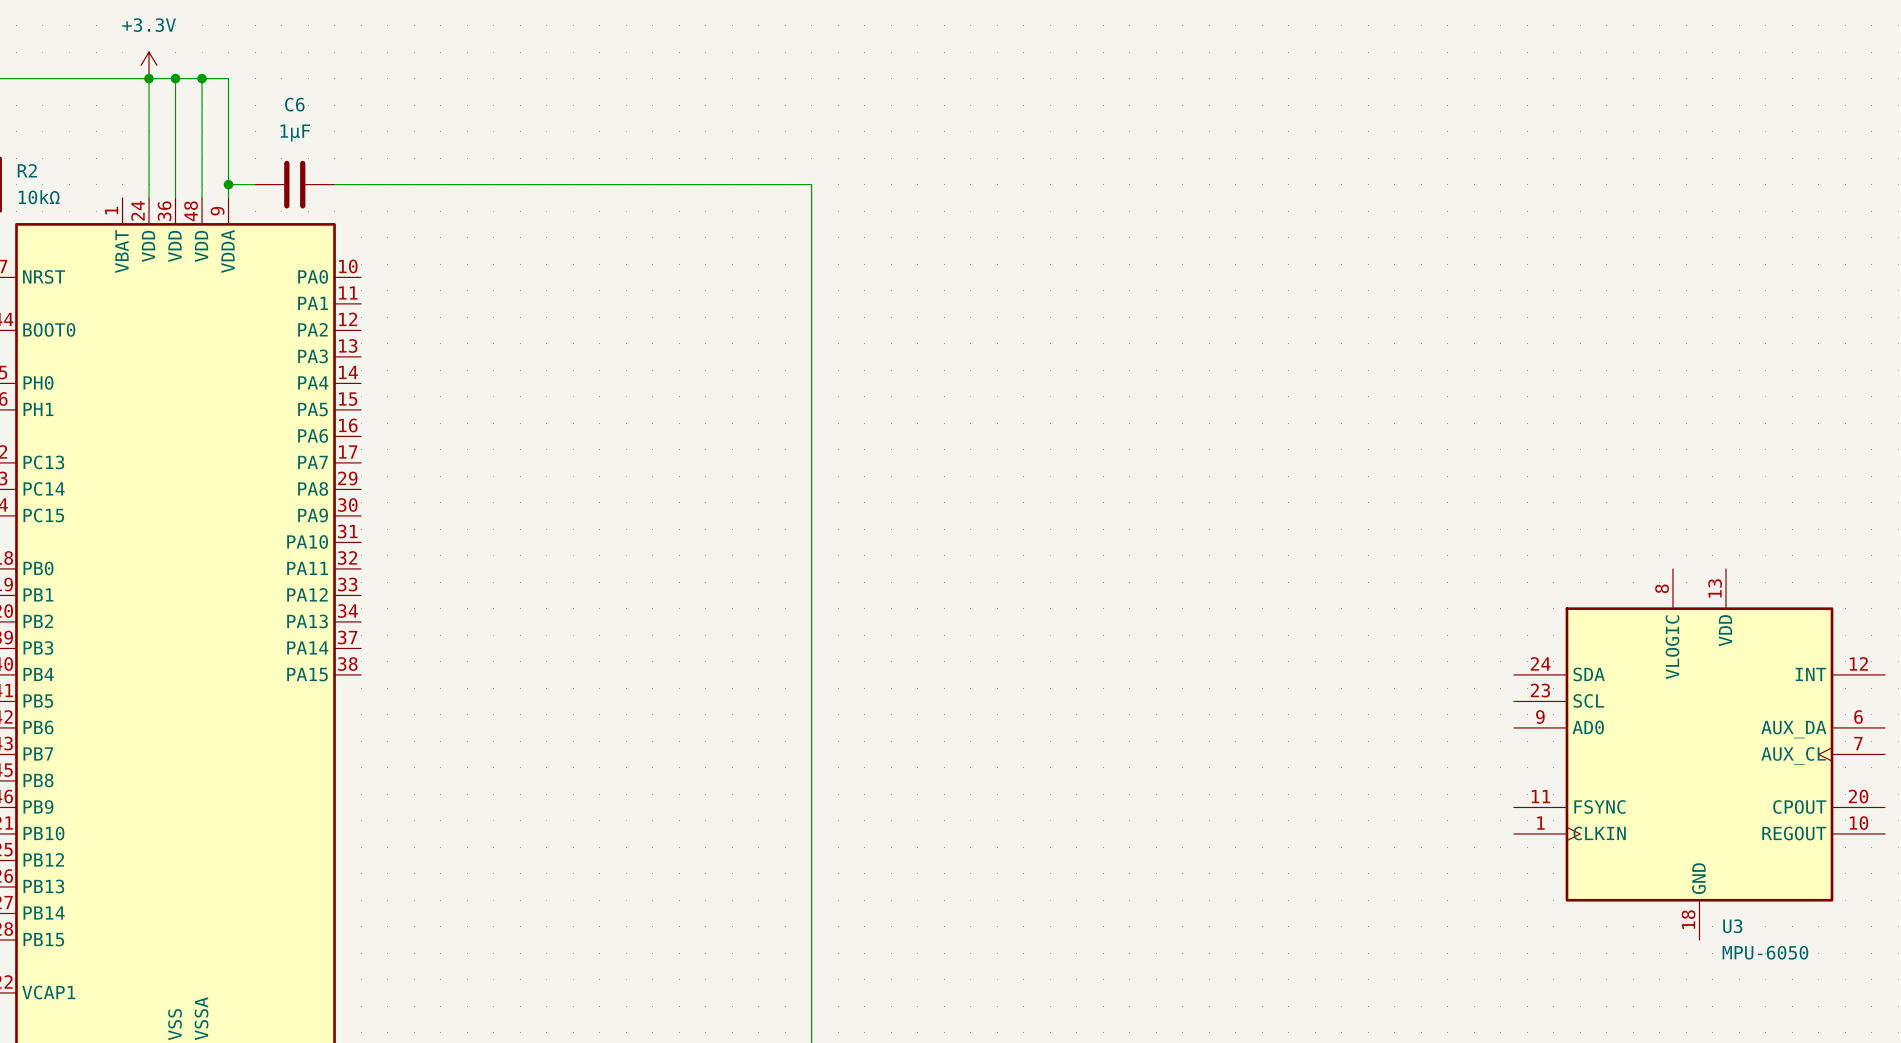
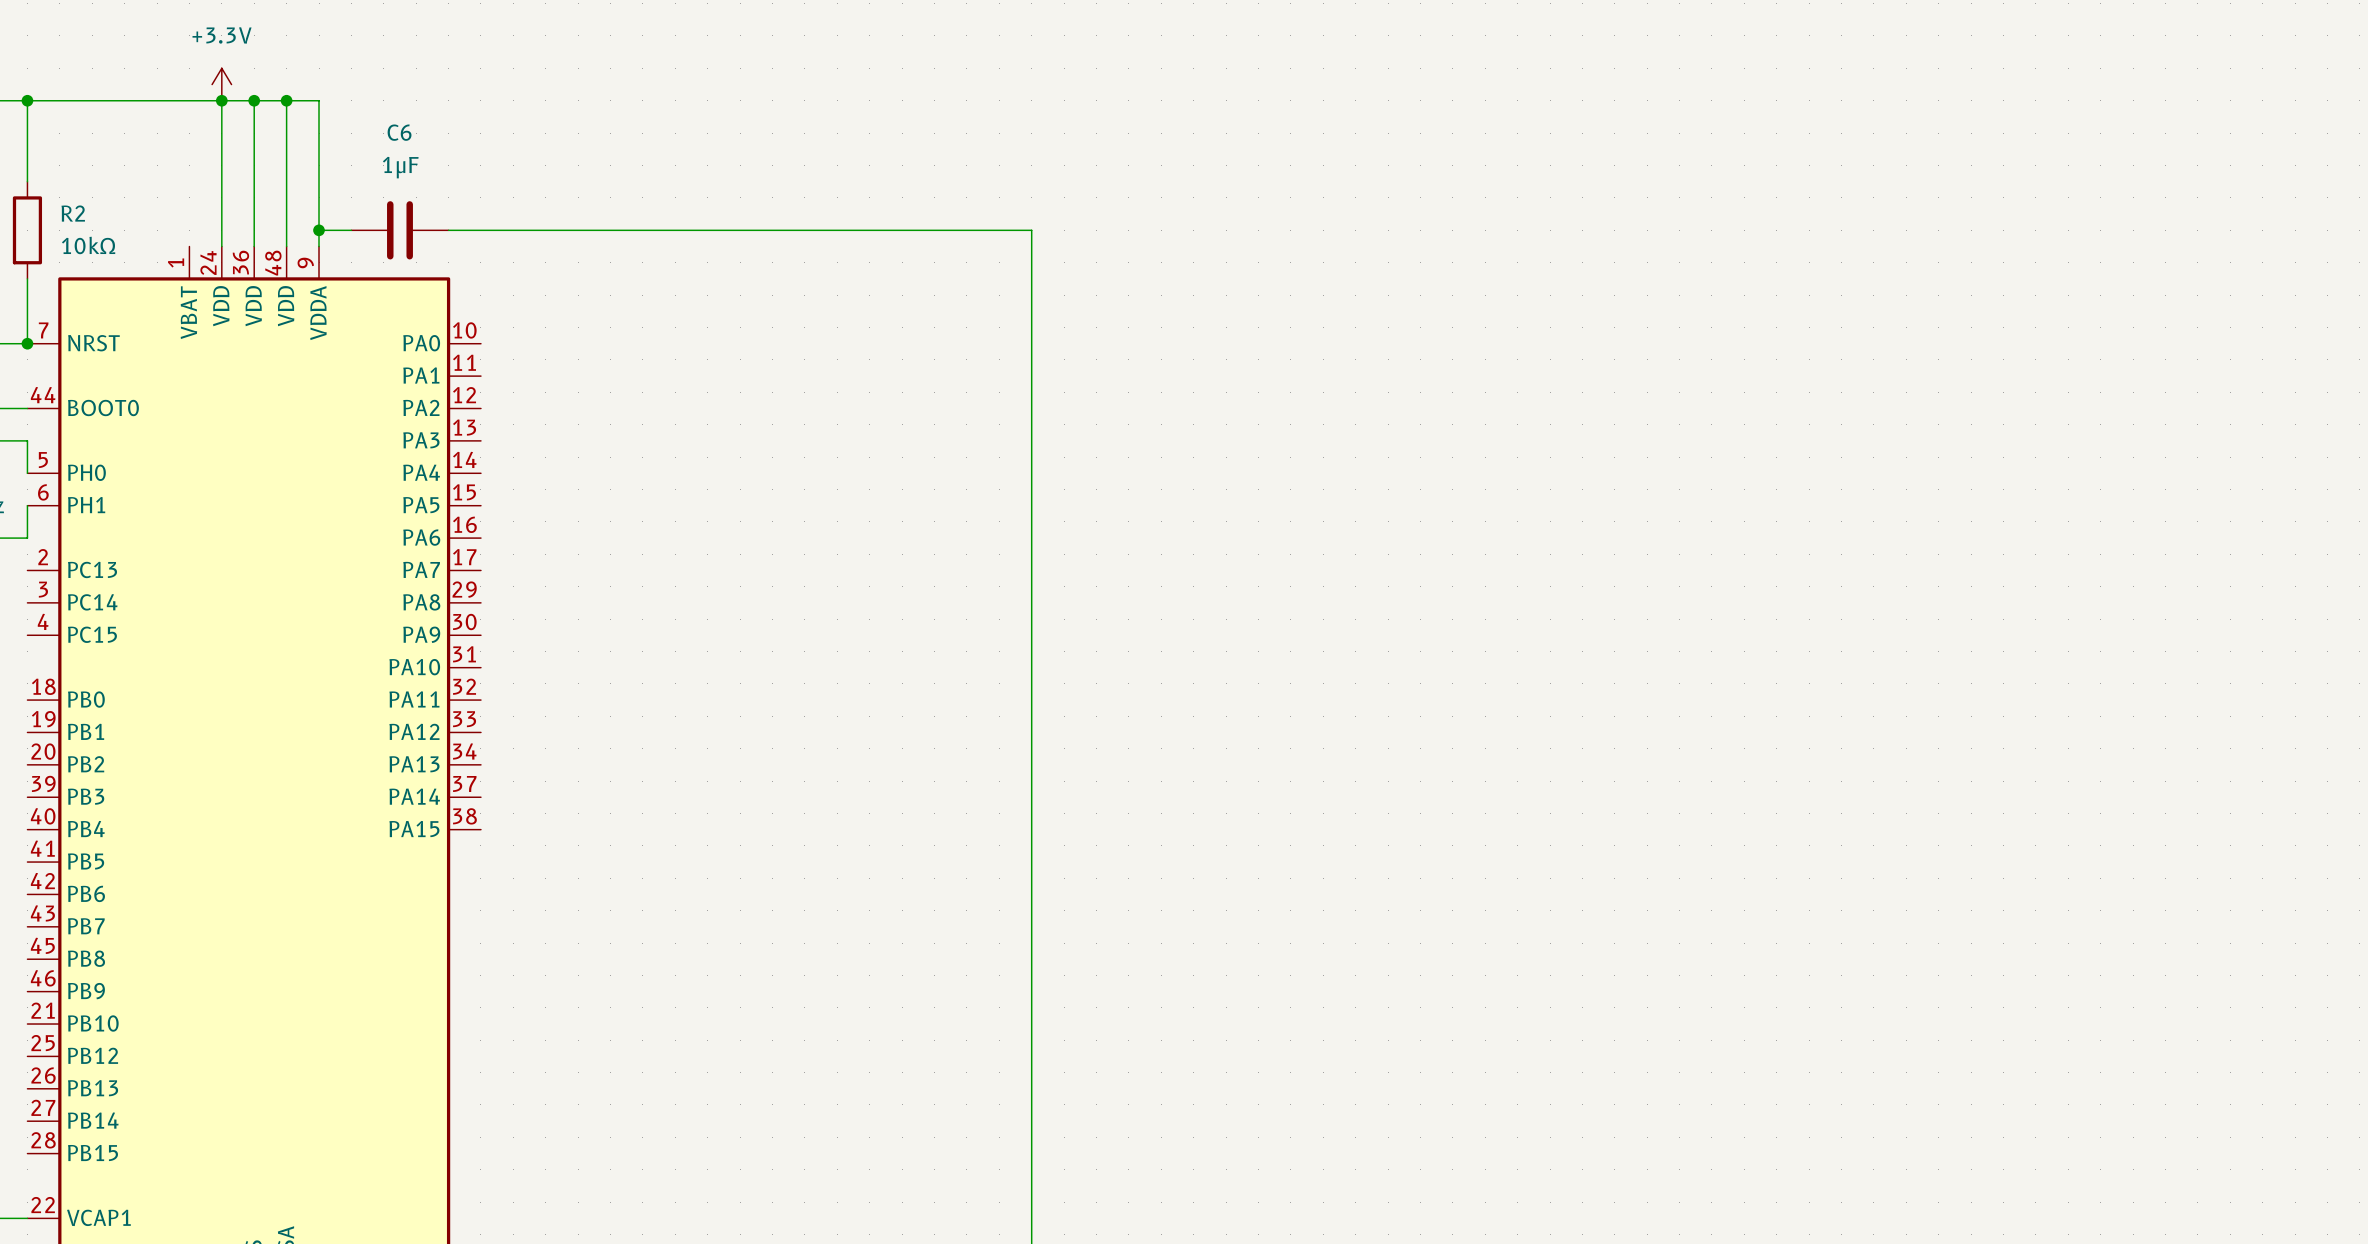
U3: MPU-6050 (1699, 754) -> none

